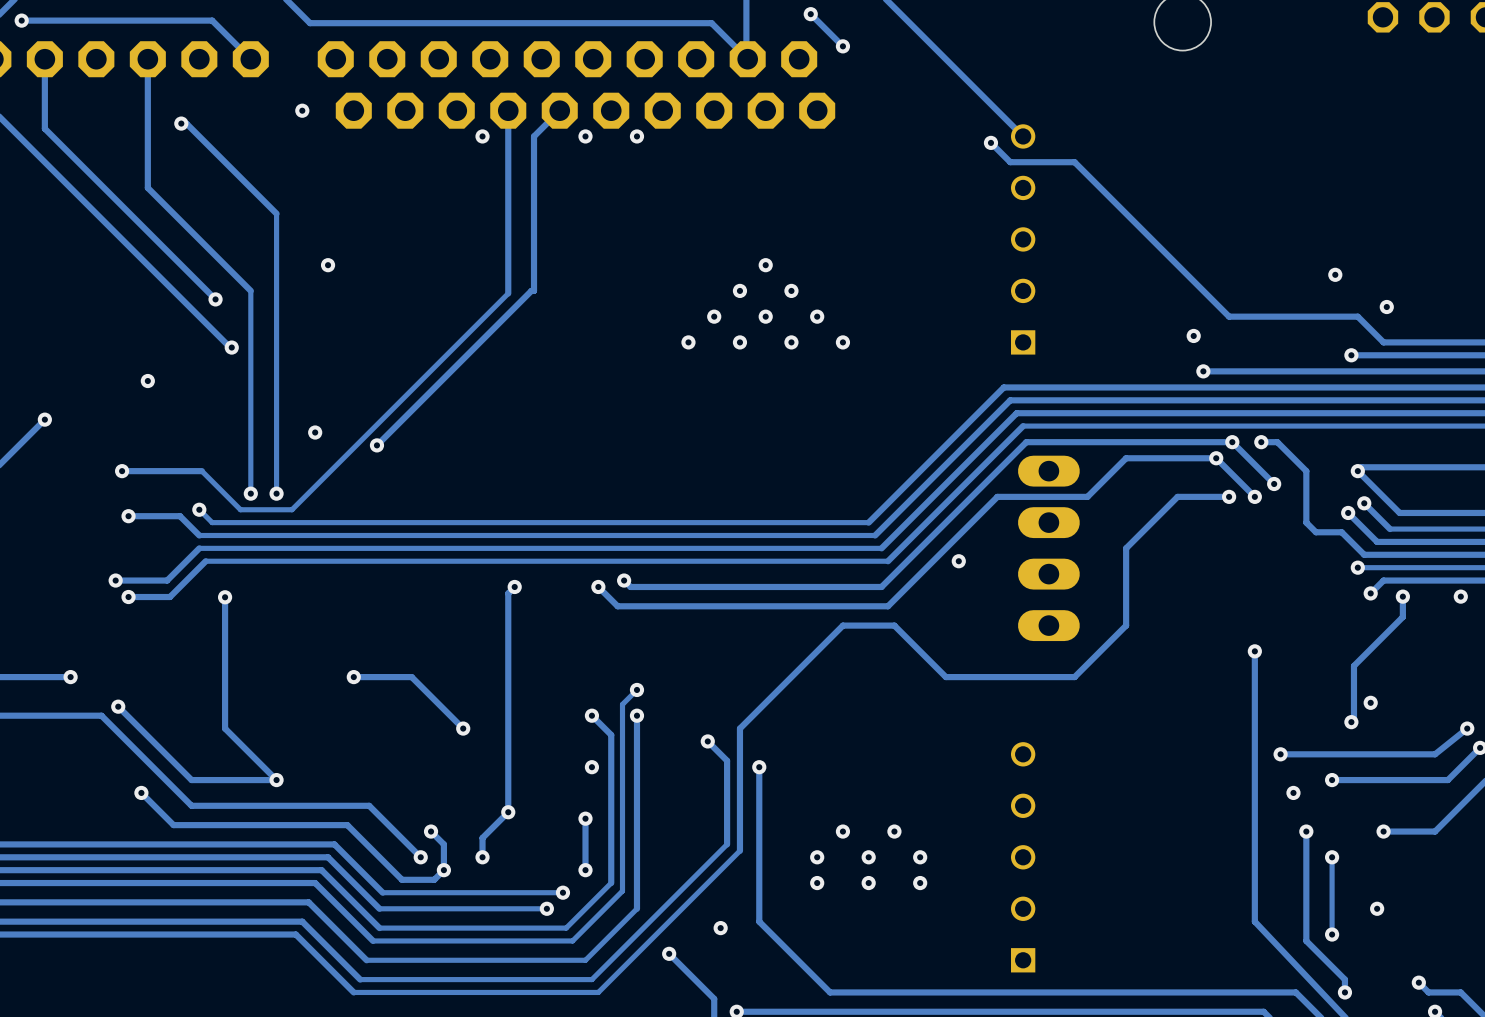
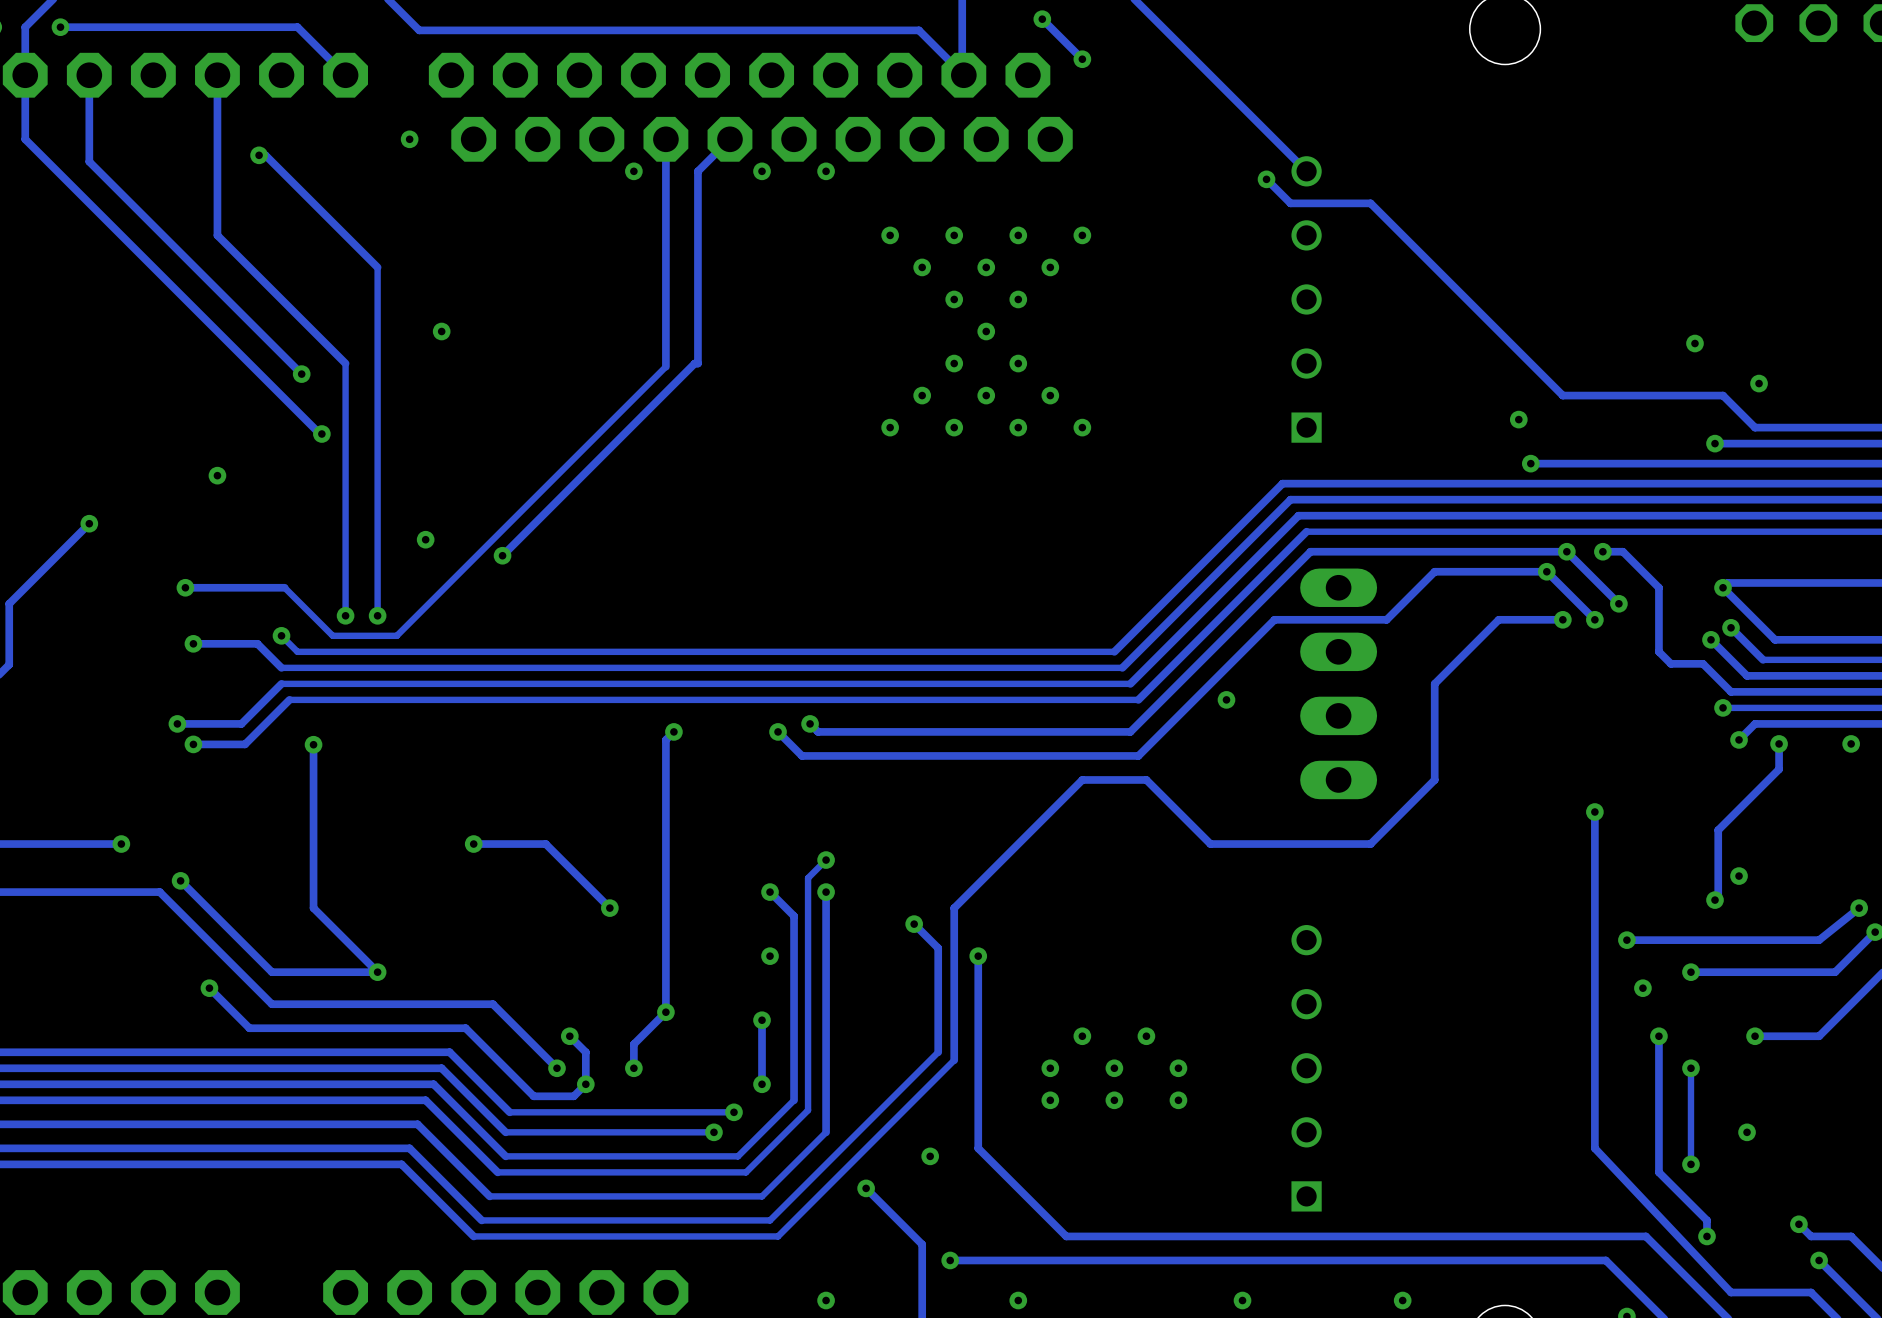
via: none -> (890, 235)
via: none -> (954, 235)
via: none -> (1018, 235)
via: none -> (1082, 235)
via: none -> (922, 267)
via: none -> (986, 267)
via: none -> (1050, 267)
via: none -> (954, 299)
via: none -> (1018, 299)

